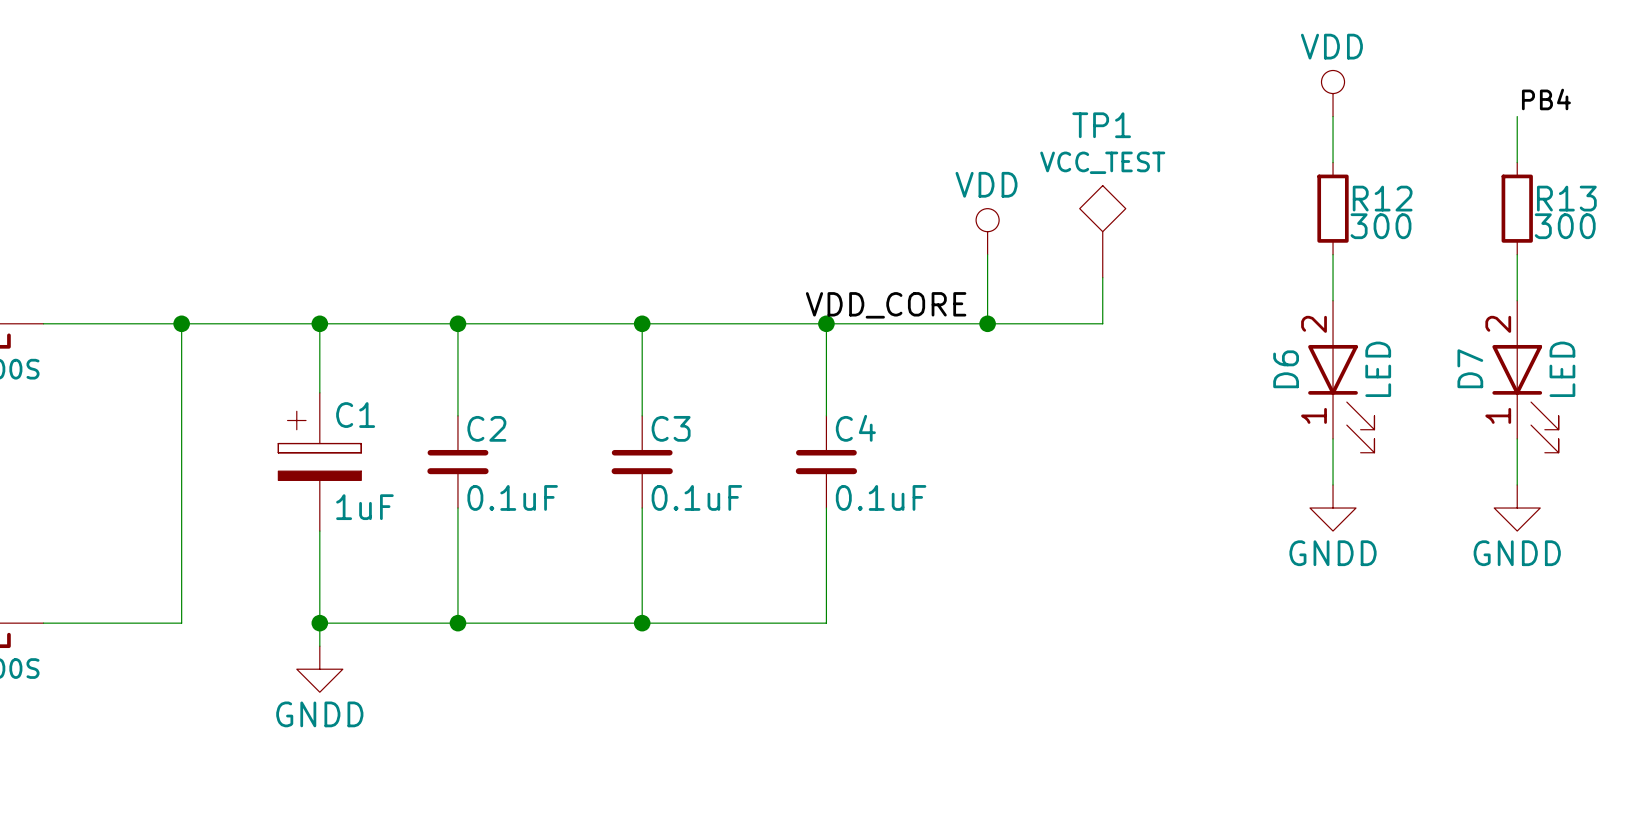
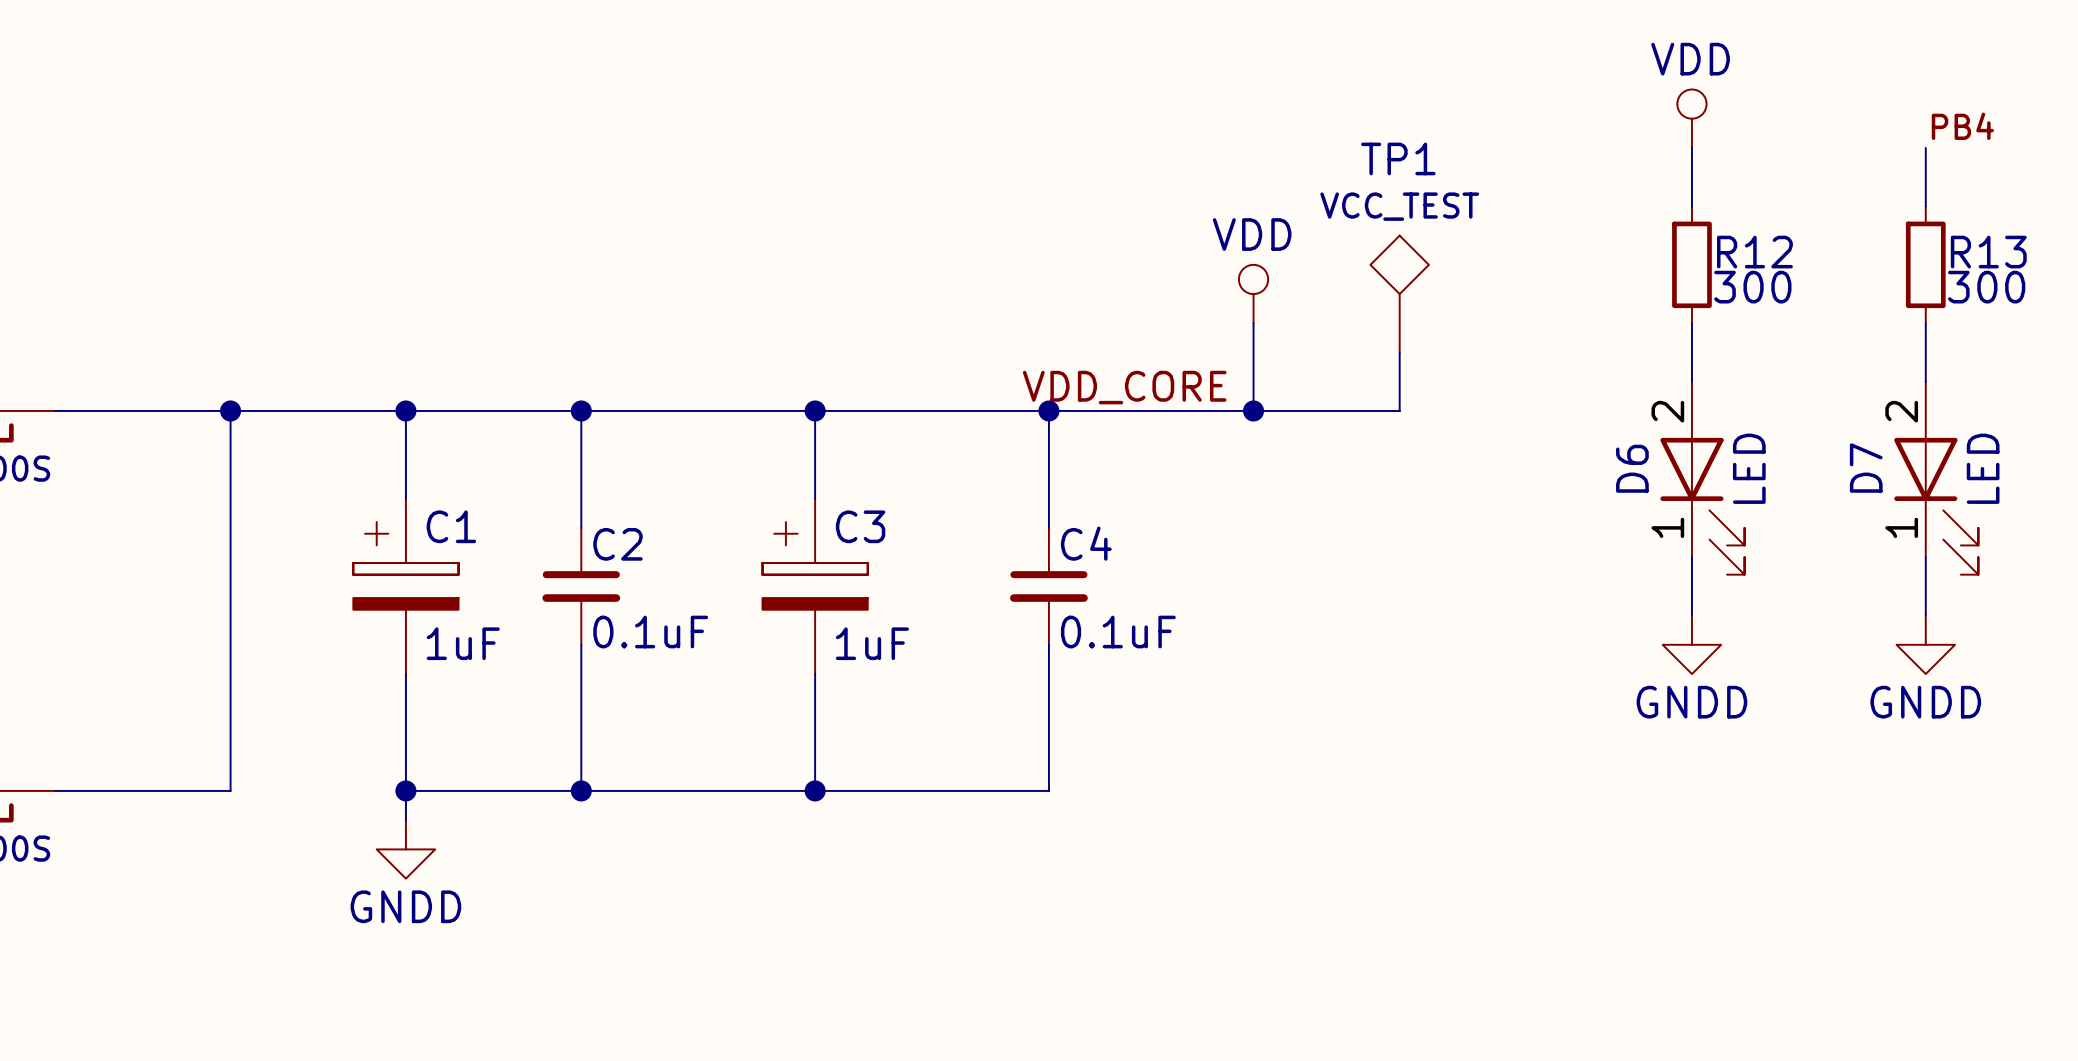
C3 symbol: [611, 415, 673, 509] -> [762, 498, 868, 675]
C3 value: 0.1uF (696, 497) -> 1uF (872, 643)

